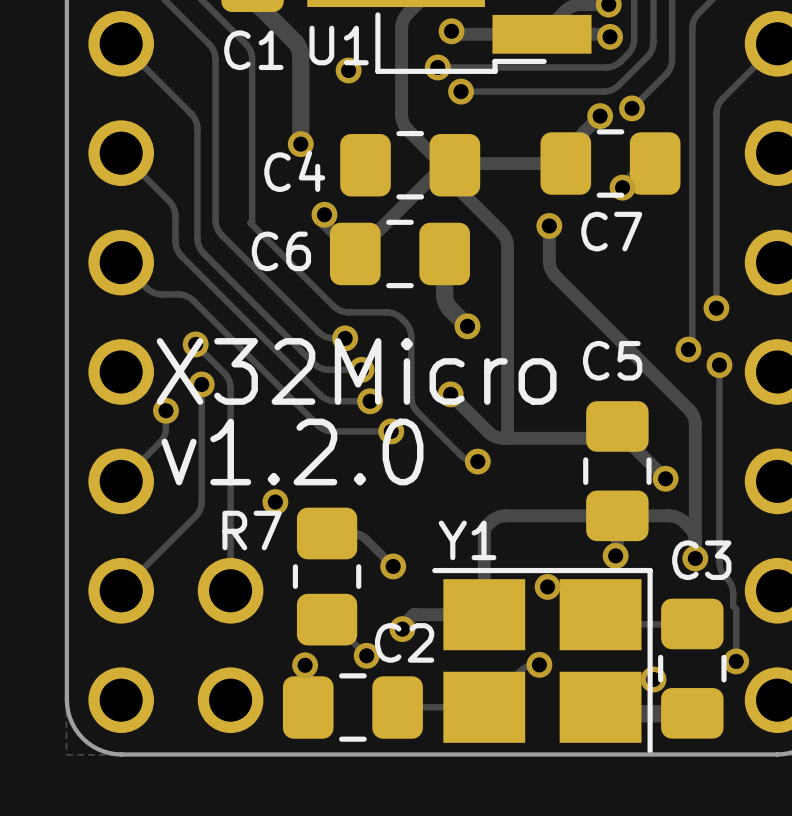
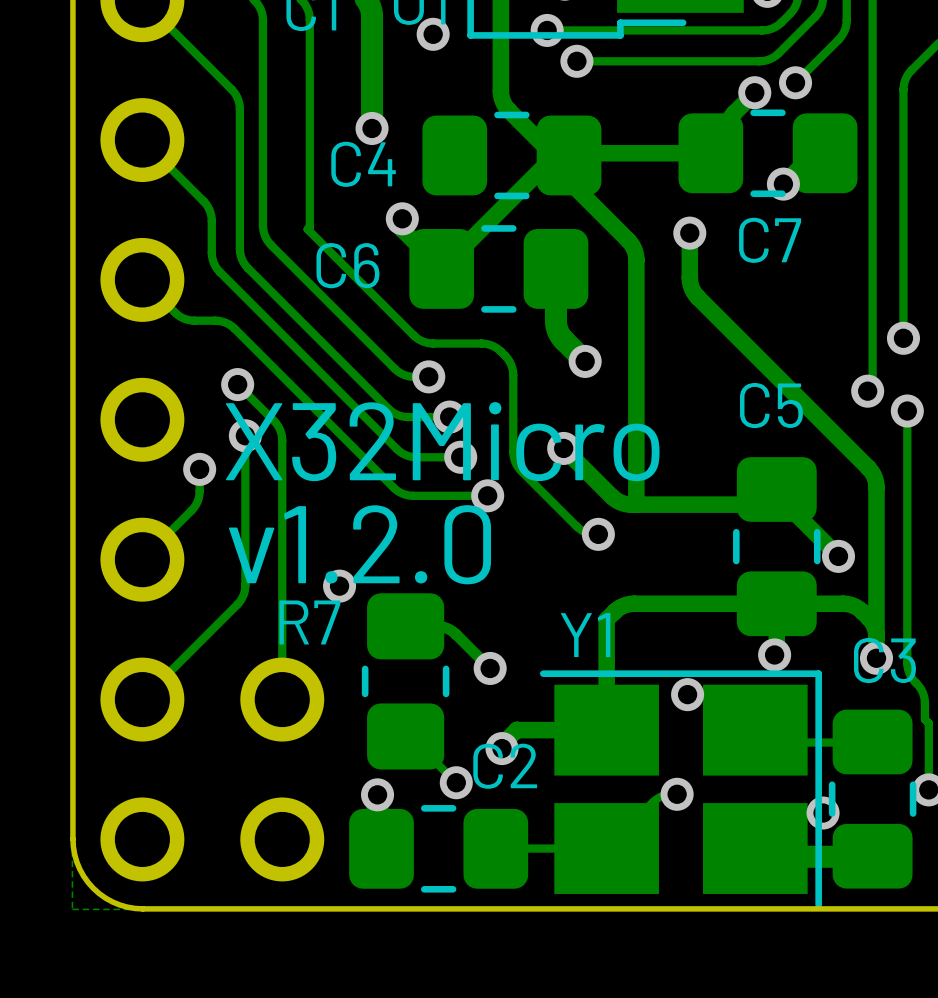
text position: X32Micro (356, 371) -> X32Micro (442, 441)
text position: v1.2.0 (292, 451) -> v1.2.0 (359, 544)

